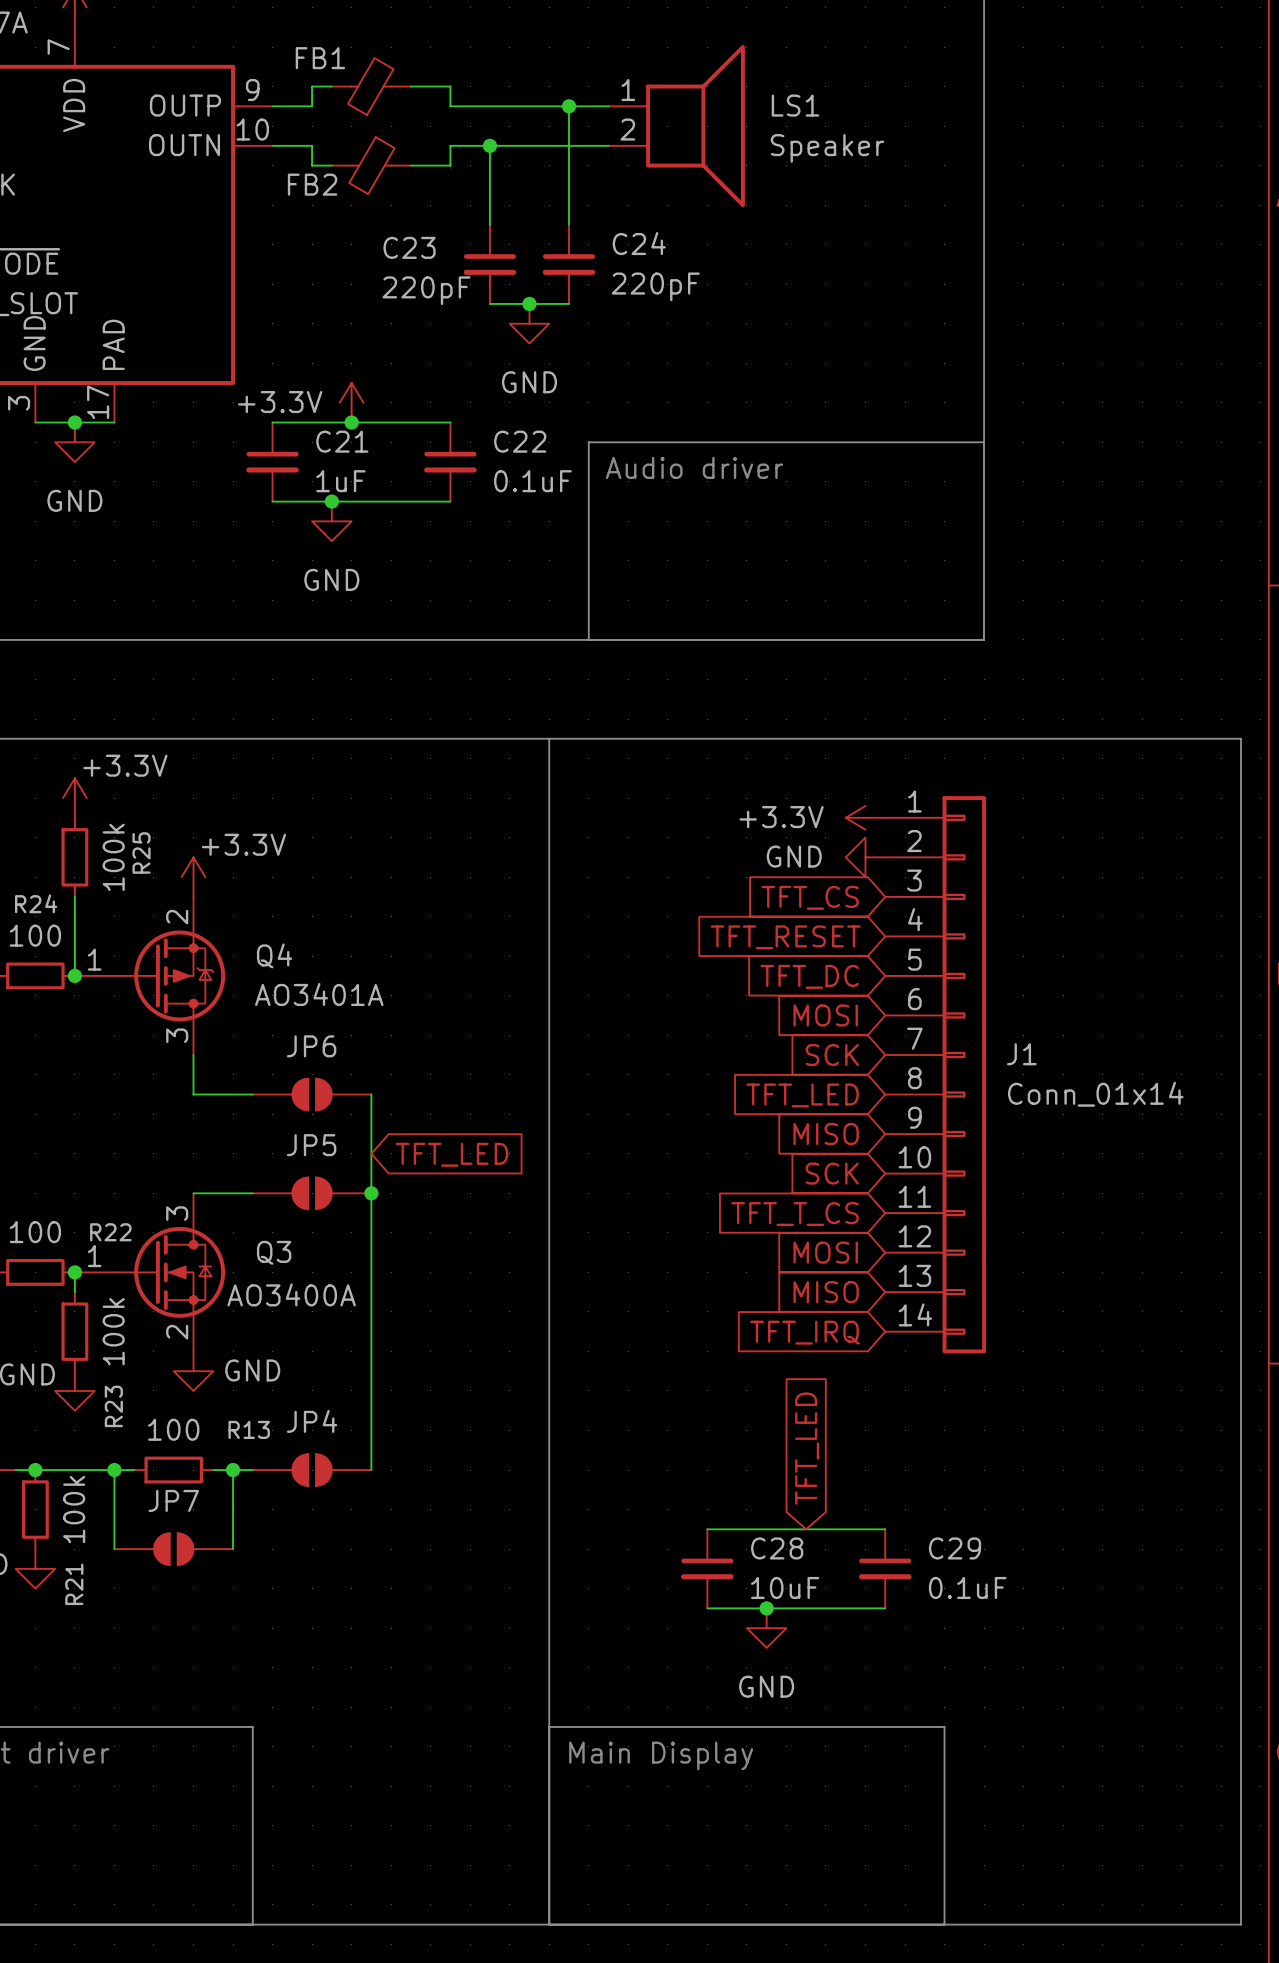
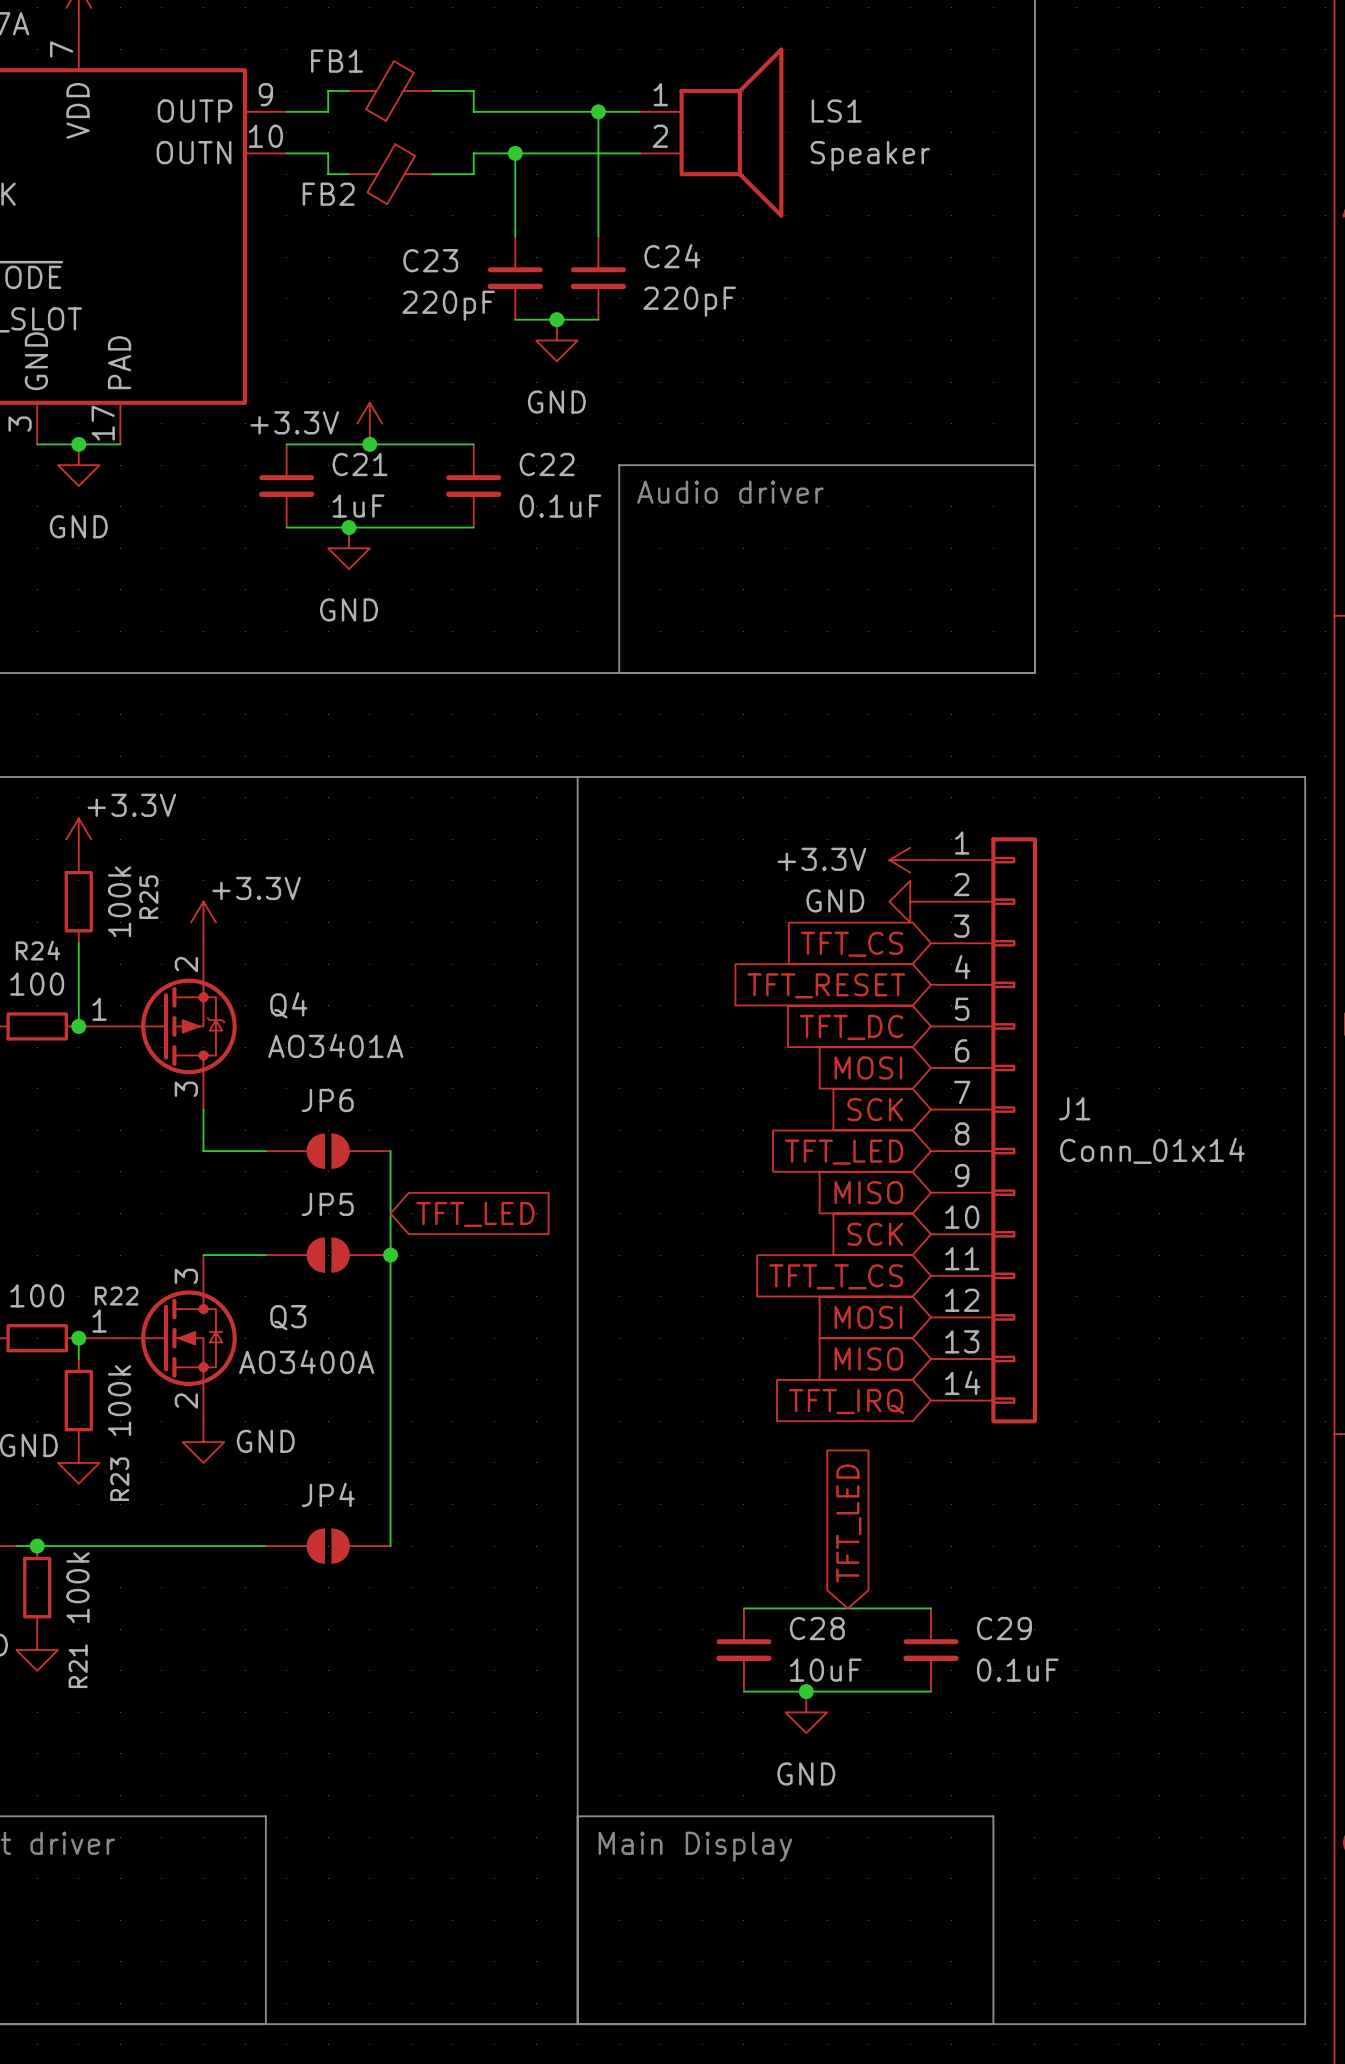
wire: (114, 1470) (114, 1549) -> none
junction: (114, 1470) -> none
wire: none -> (141, 1546) (224, 1546)
R13: 100 (173, 1470) -> none
wire: (233, 1470) (233, 1549) -> none
junction: (233, 1470) -> none
JP7: (173, 1549) -> none

